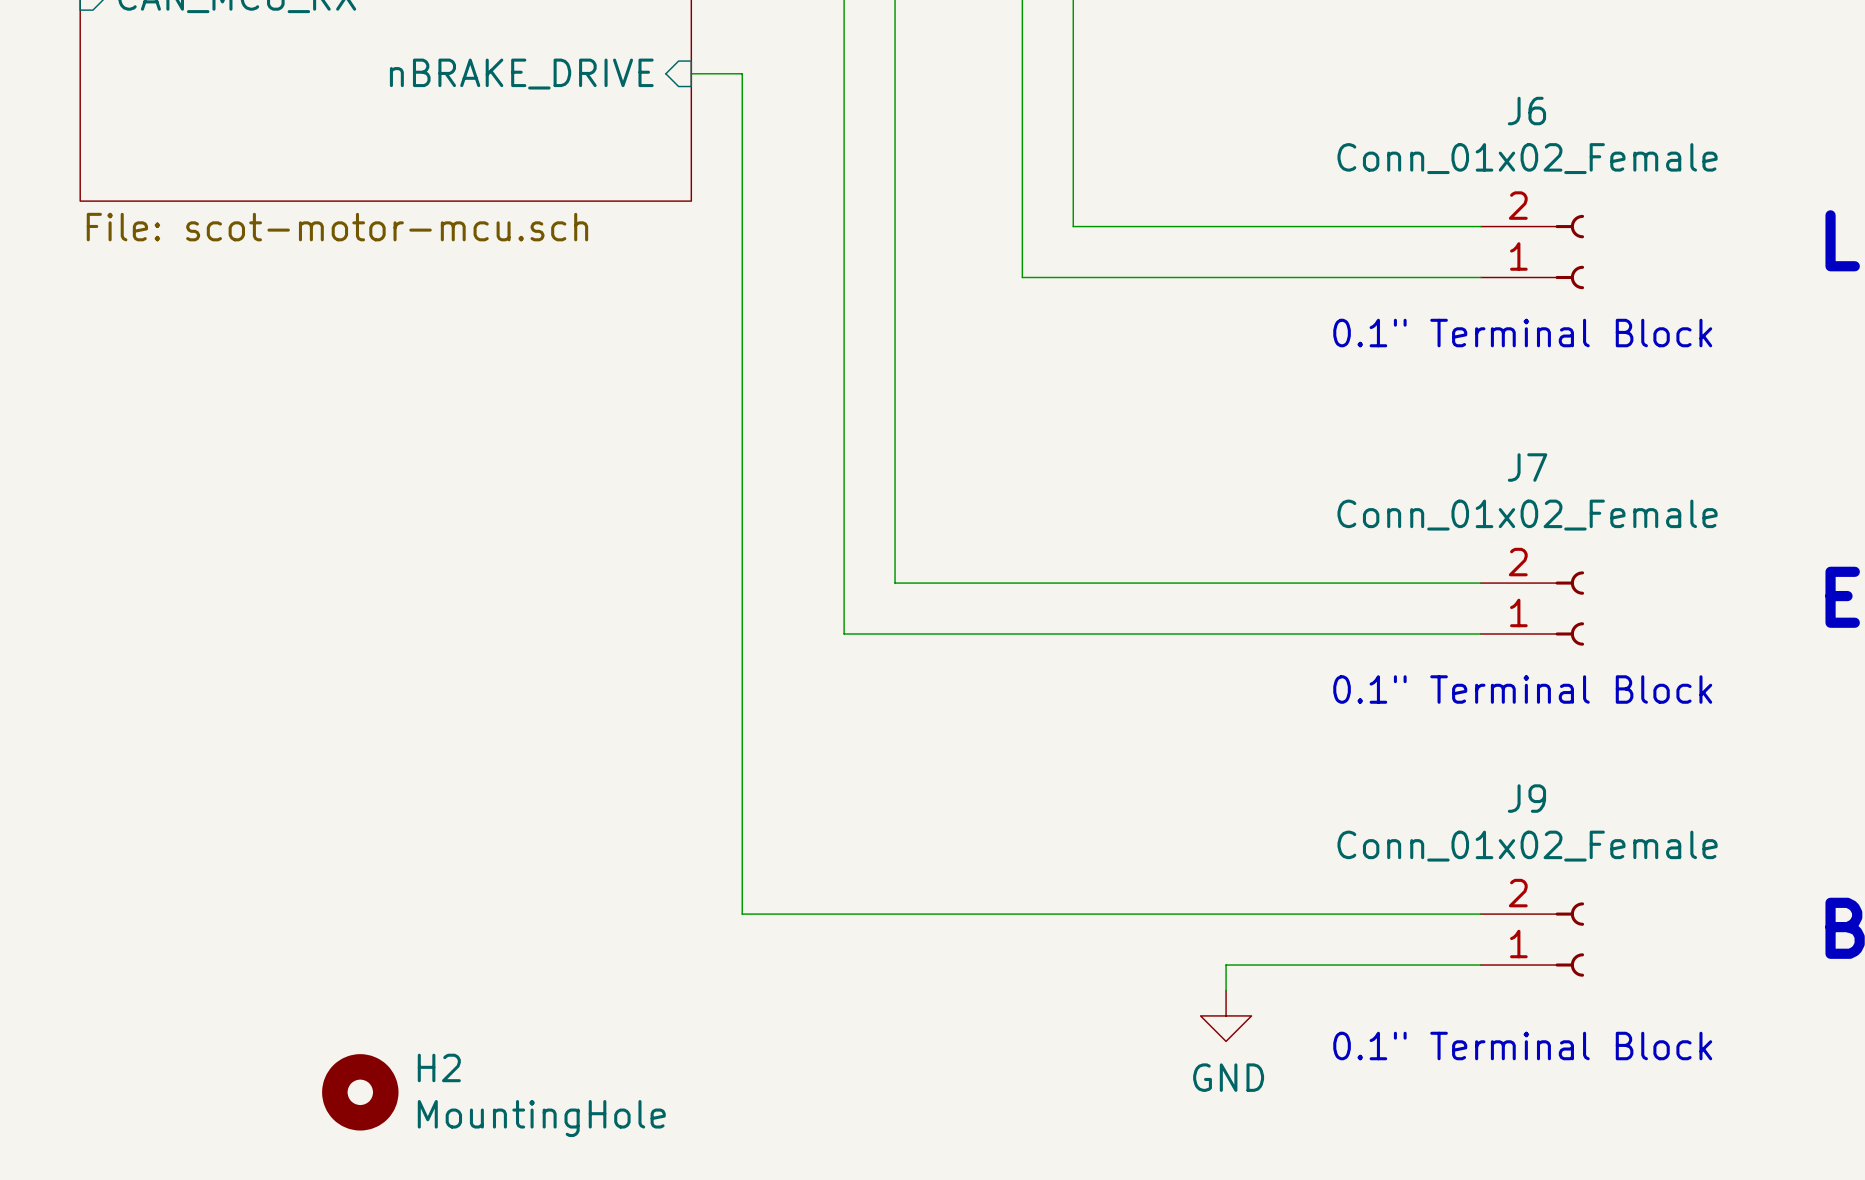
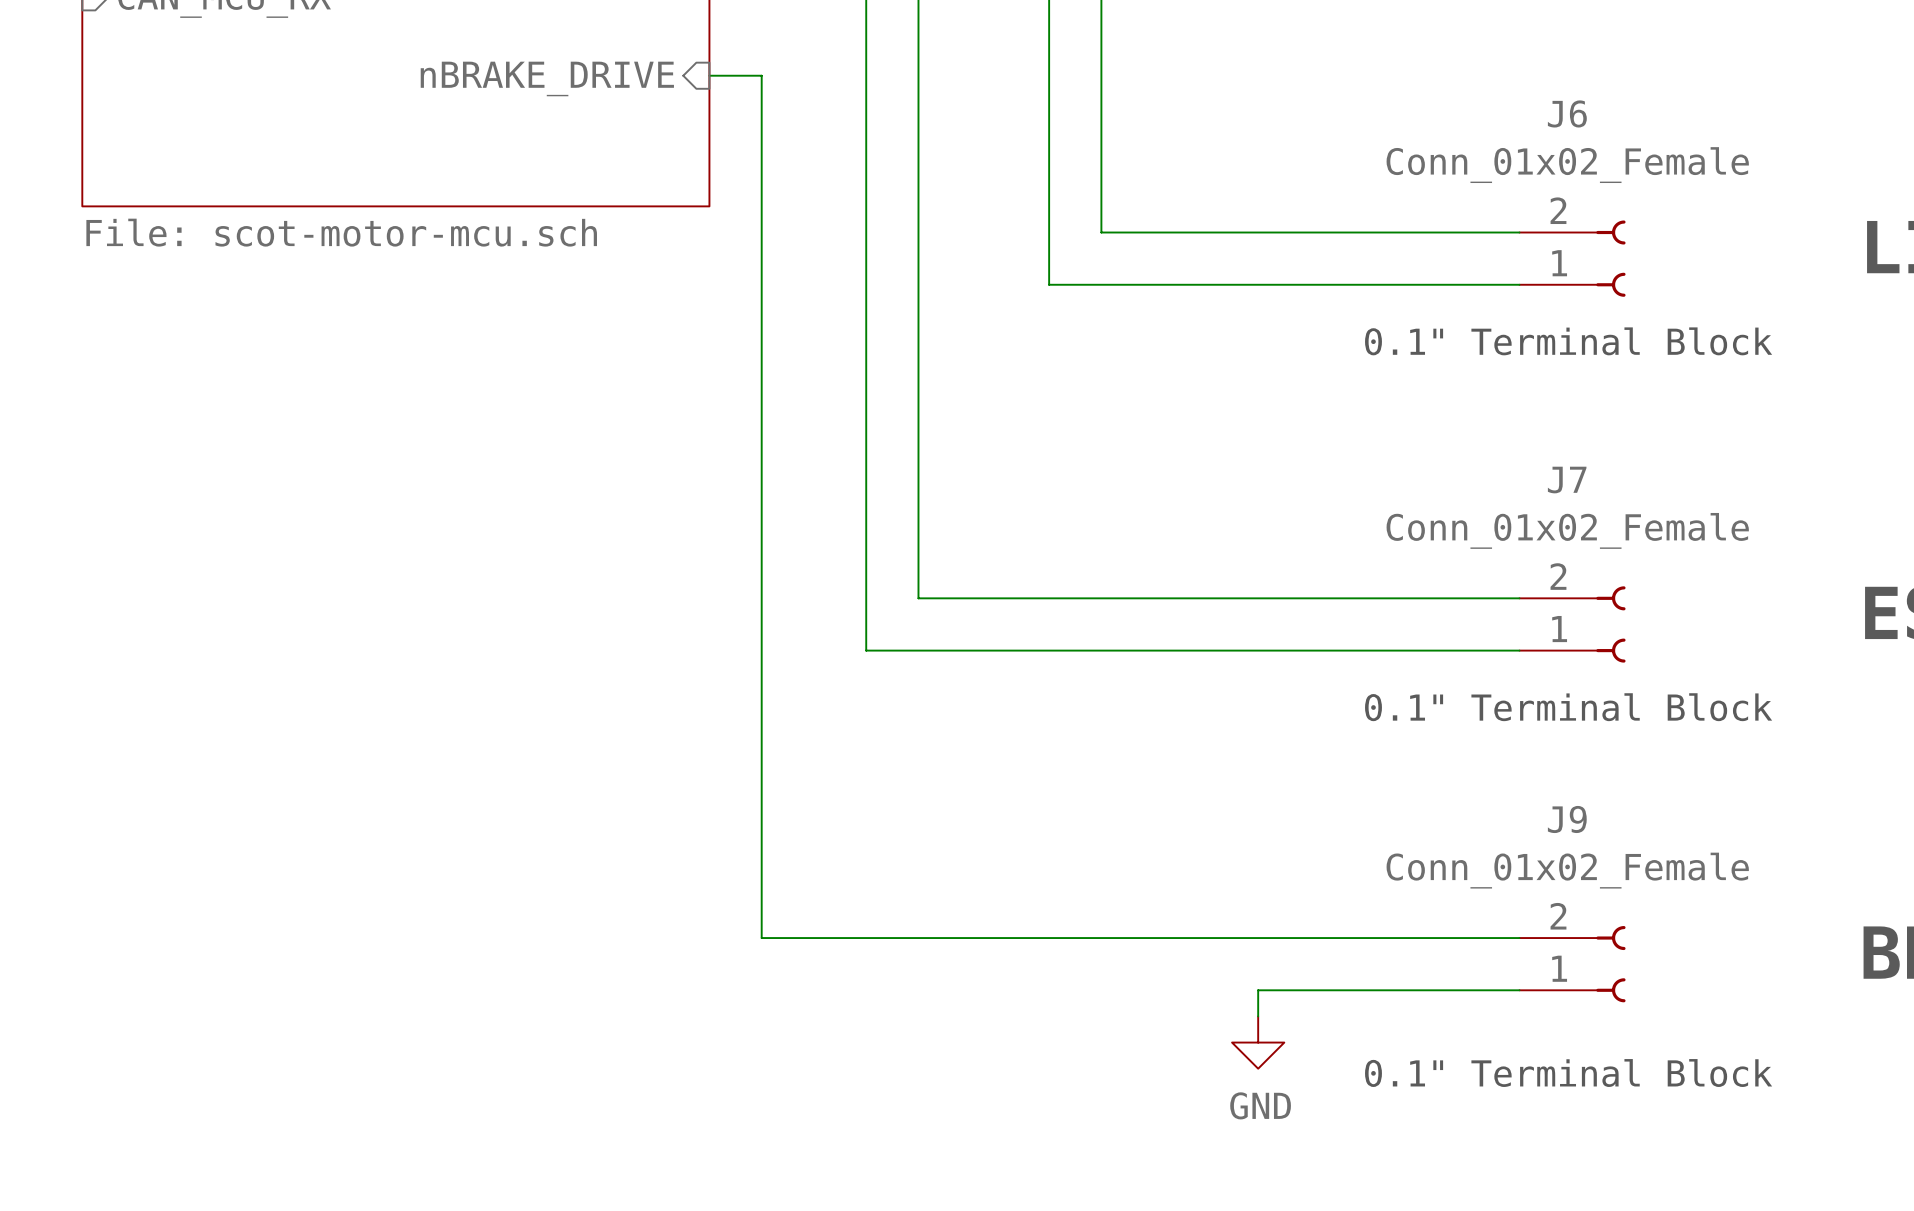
H2: MountingHole (360, 1092) -> none

